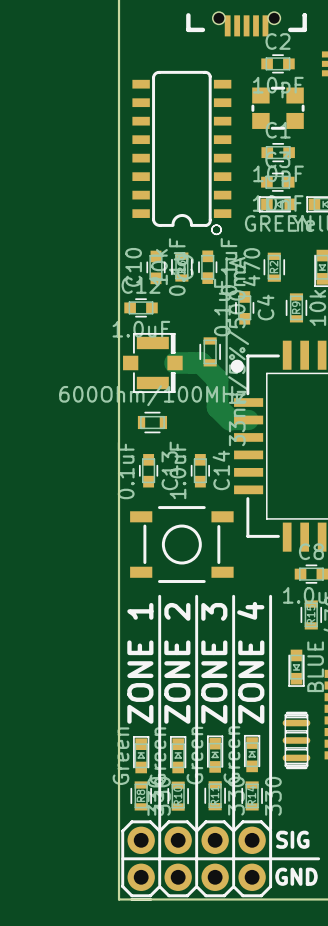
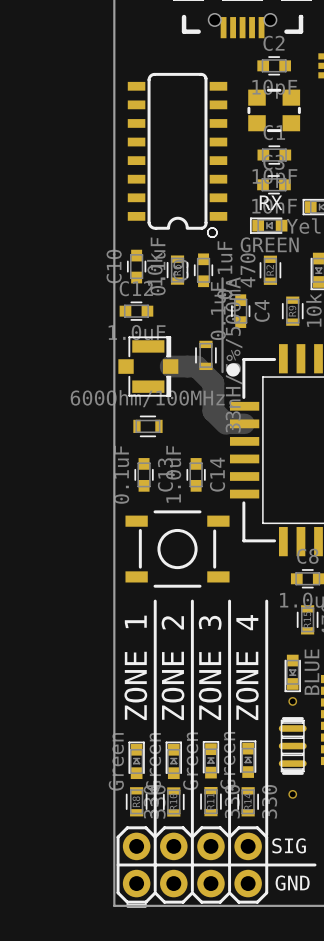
text: none -> RX (271, 202)
part position: (277, 204) -> (268, 225)
C10 position: (155, 267) -> (136, 266)
via: none -> (292, 701)
via: none -> (292, 794)

